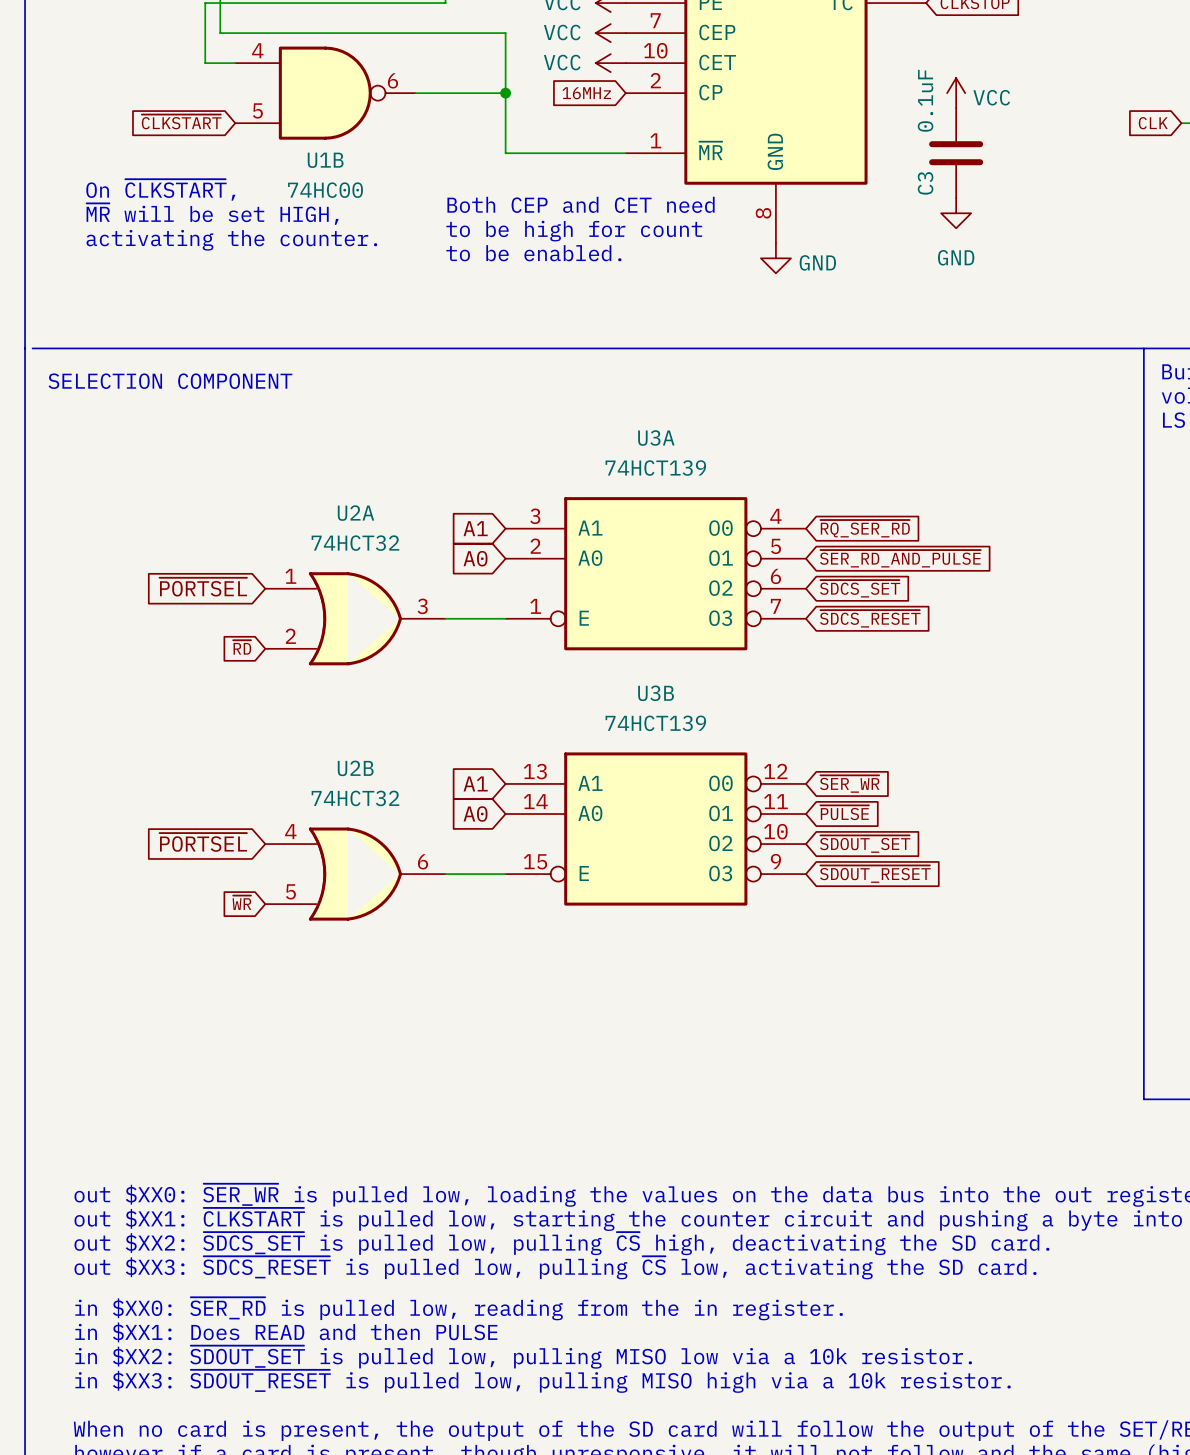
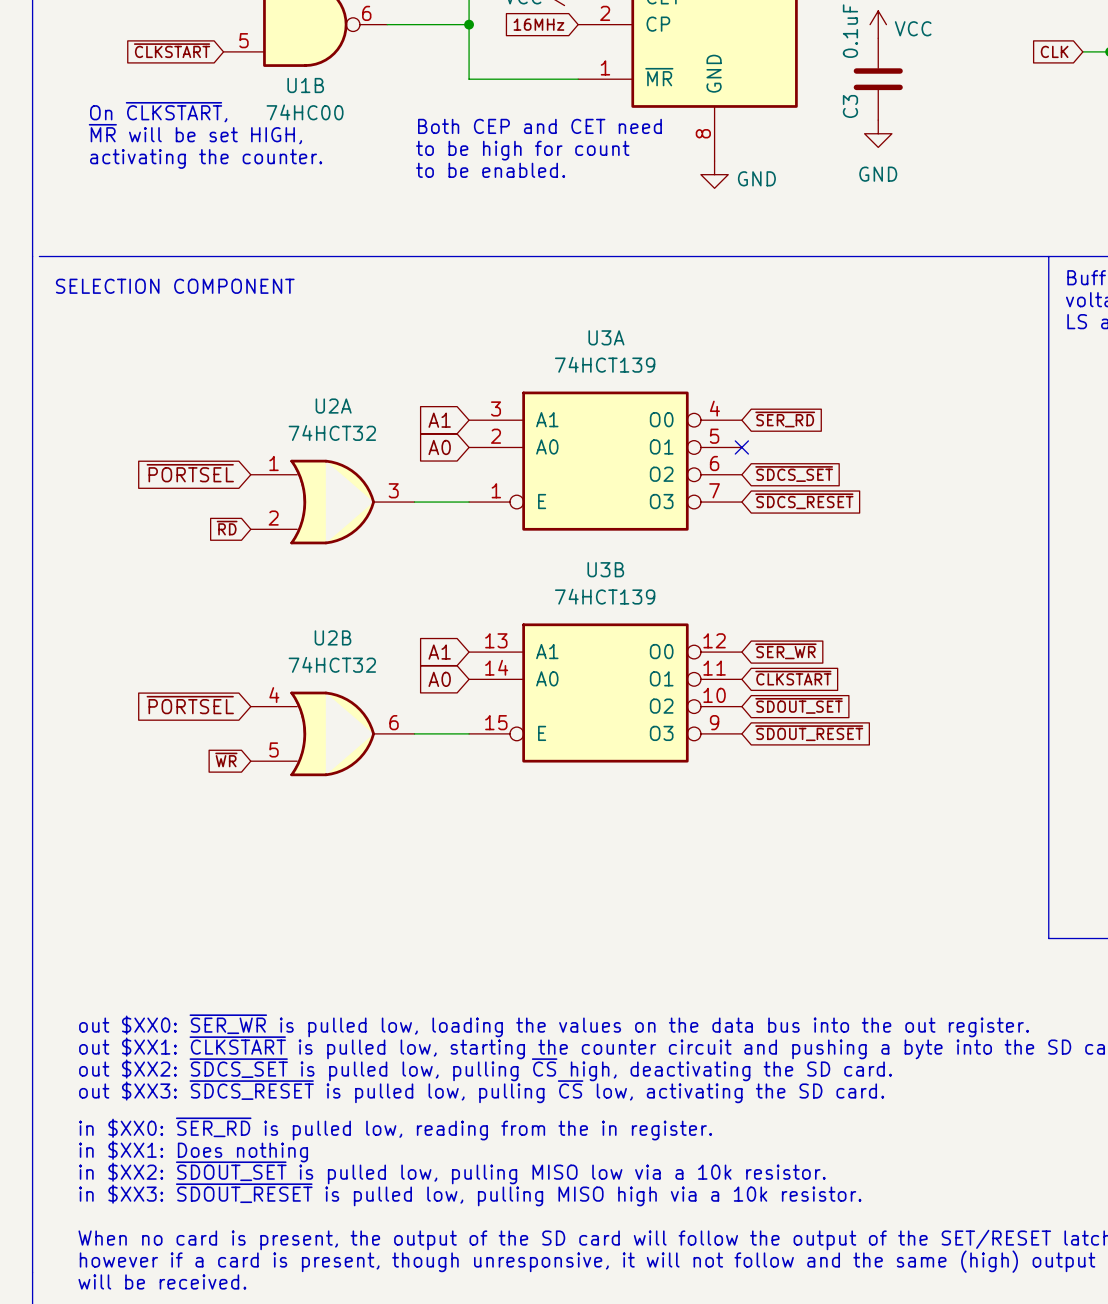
global label: ~{RQ_SER_RD} (865, 528) -> ~{SER_RD} (785, 419)
no-connect mark: none -> (741, 447)
global label: ~{SER_RD_AND_PULSE} (900, 558) -> none
global label: ~{PULSE} (844, 812) -> ~{CLKSTART} (793, 678)
text: in $XX1: Does READ and then PULSE (286, 1332) -> in $XX1: Does nothing (193, 1151)

